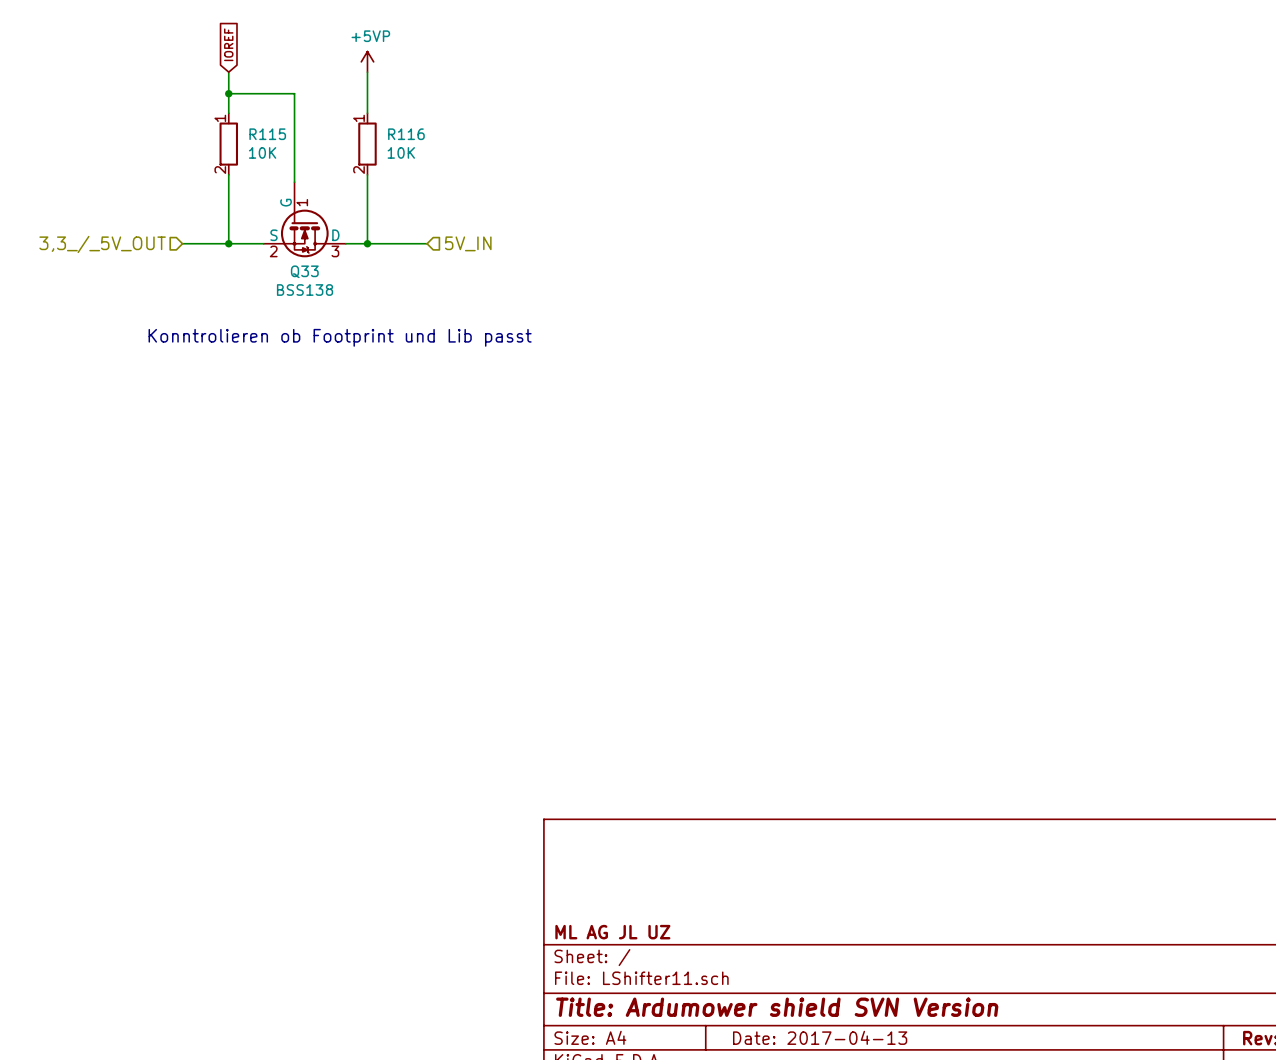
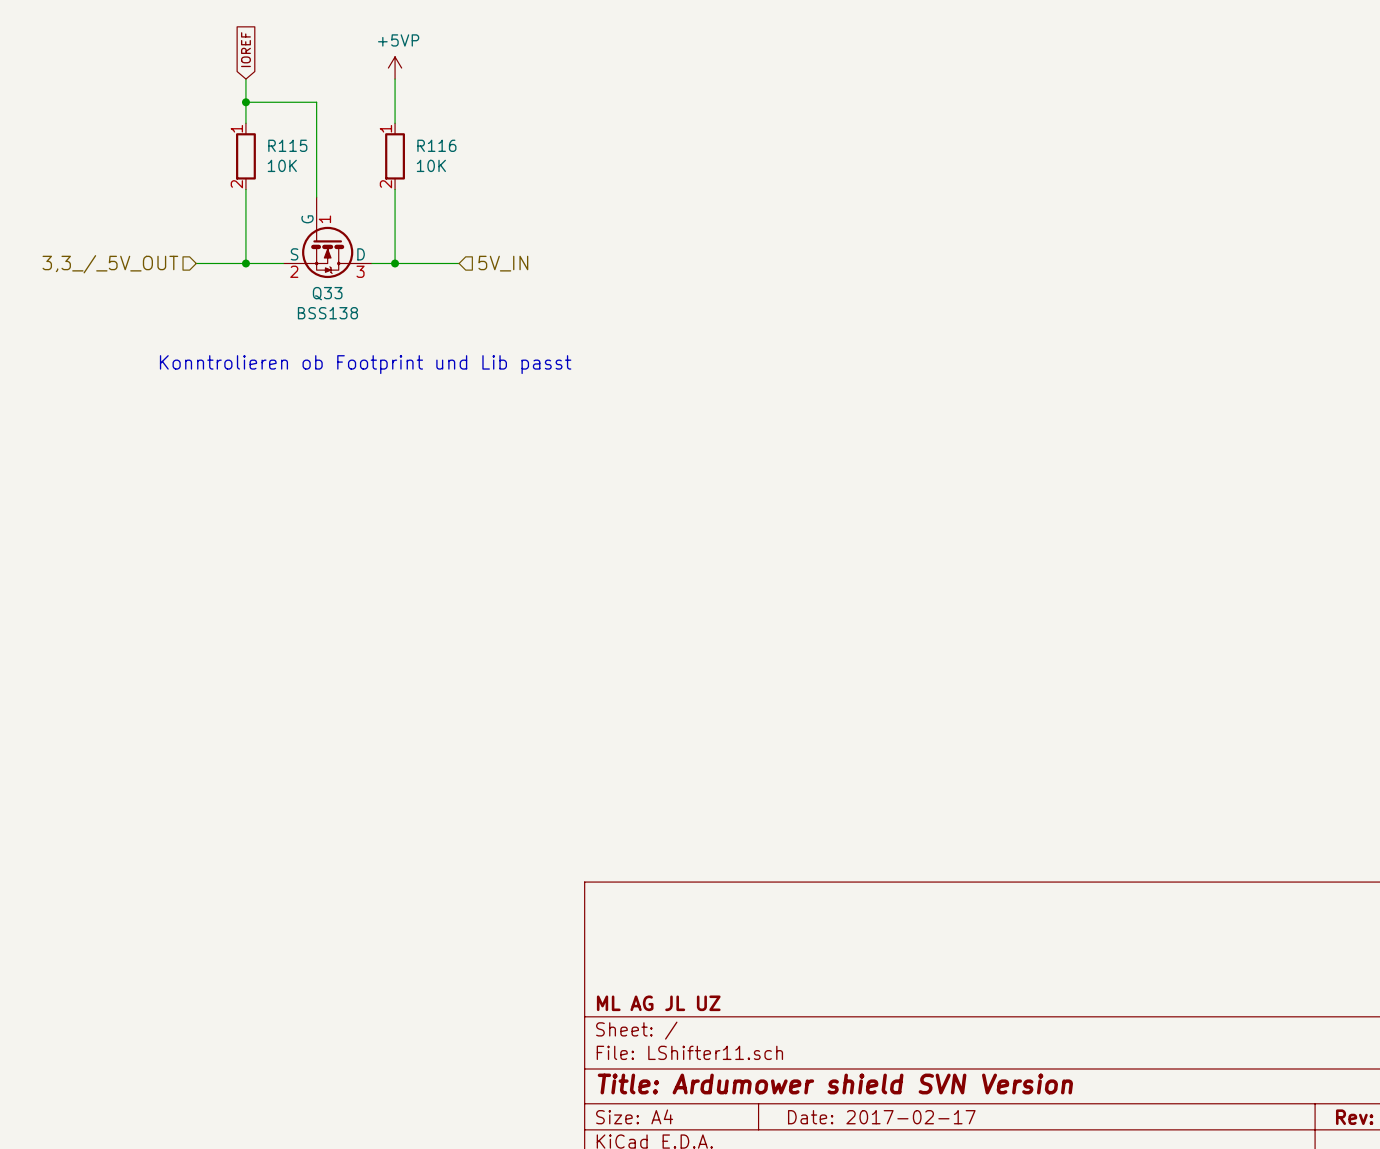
title block: Date: 2017-04-13 (820, 1037) -> Date: 2017-02-17 (881, 1117)

